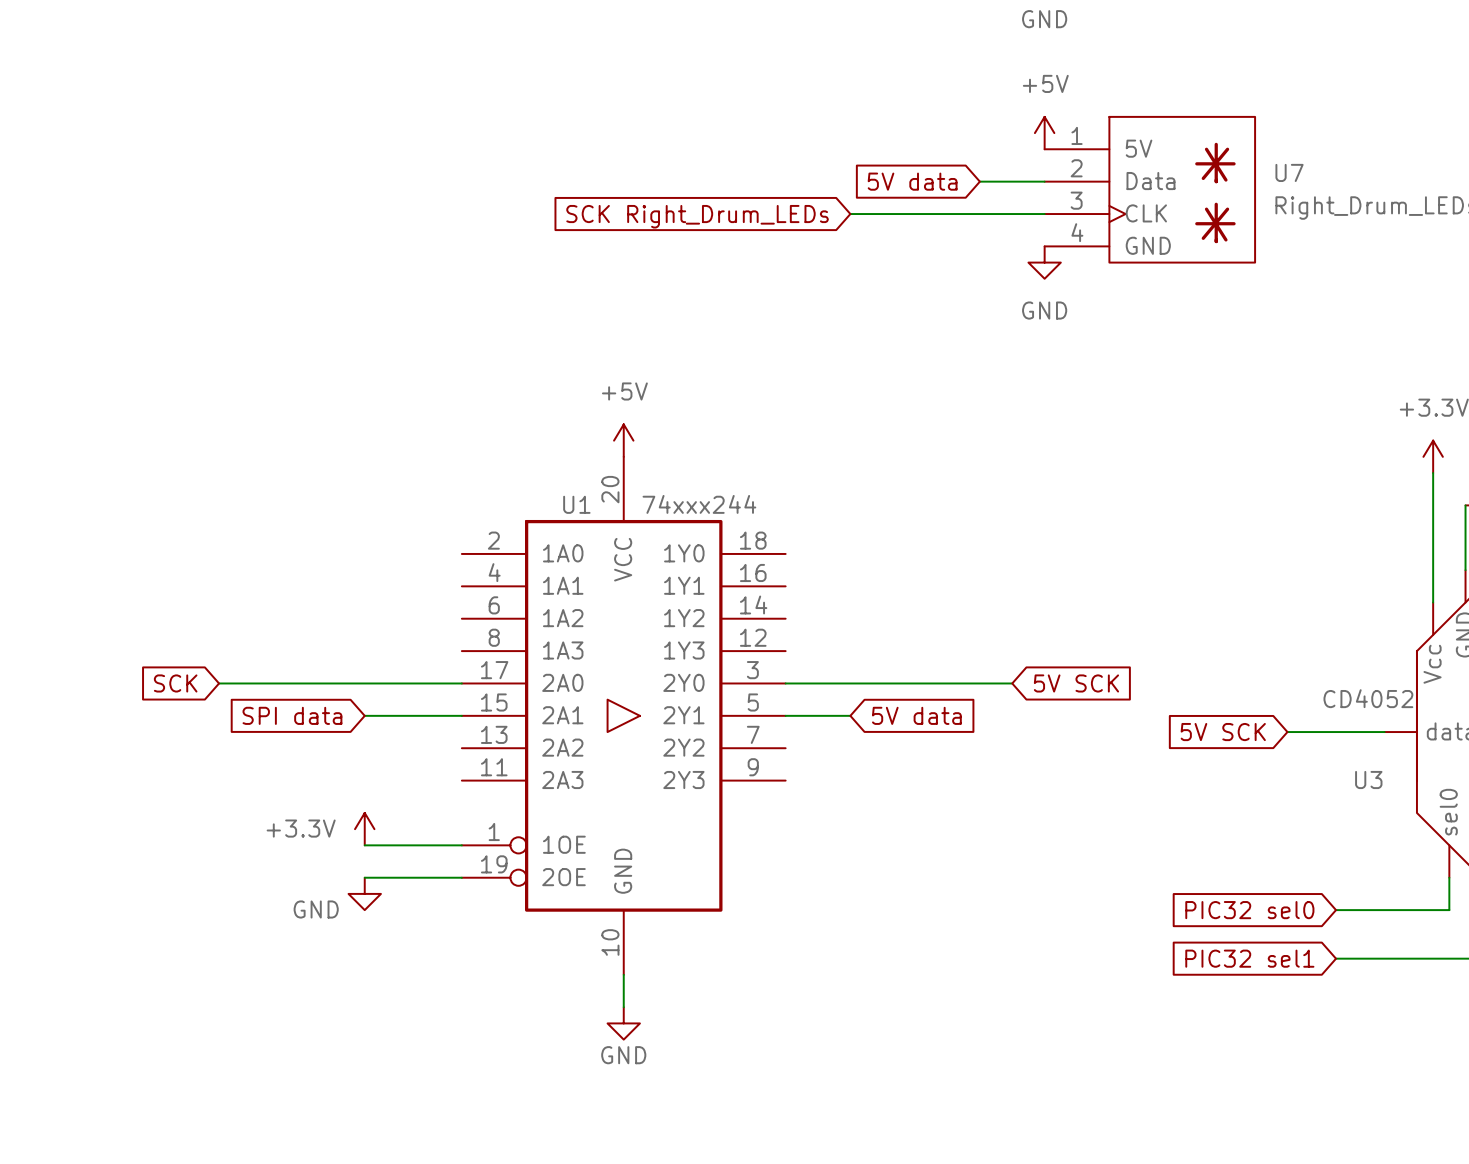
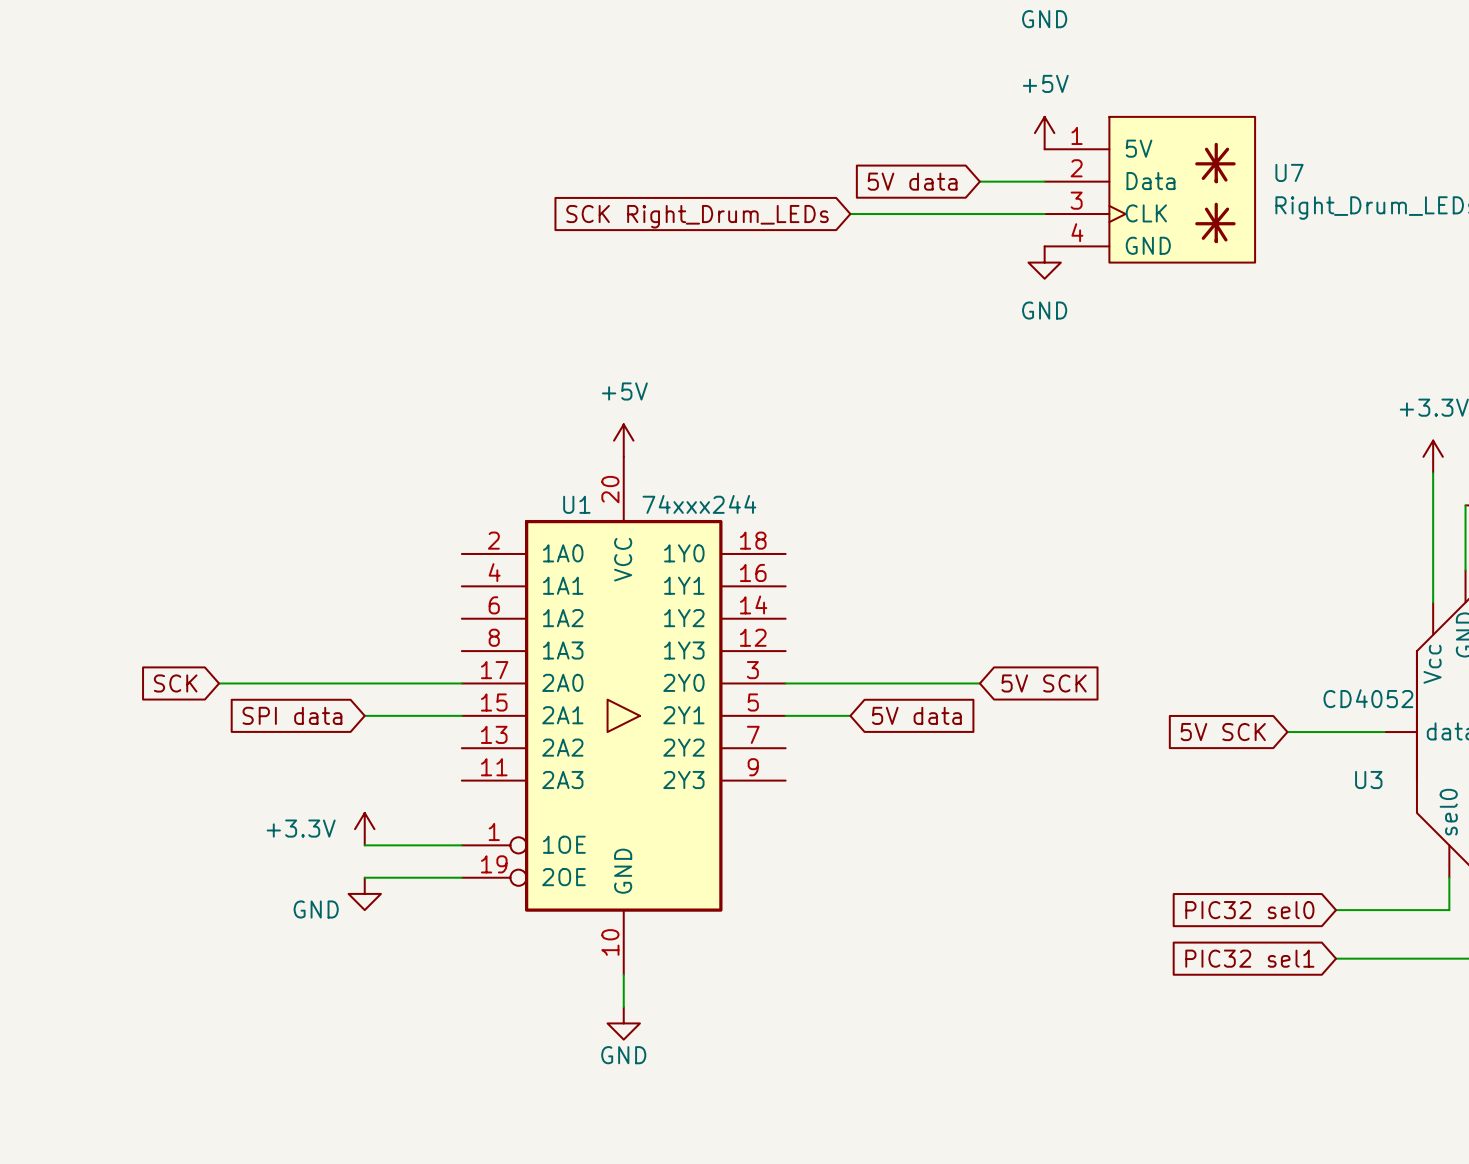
wire: (979, 683) (1012, 683) -> none
global label position: 5V SCK (1076, 683) -> 5V SCK (1044, 683)

